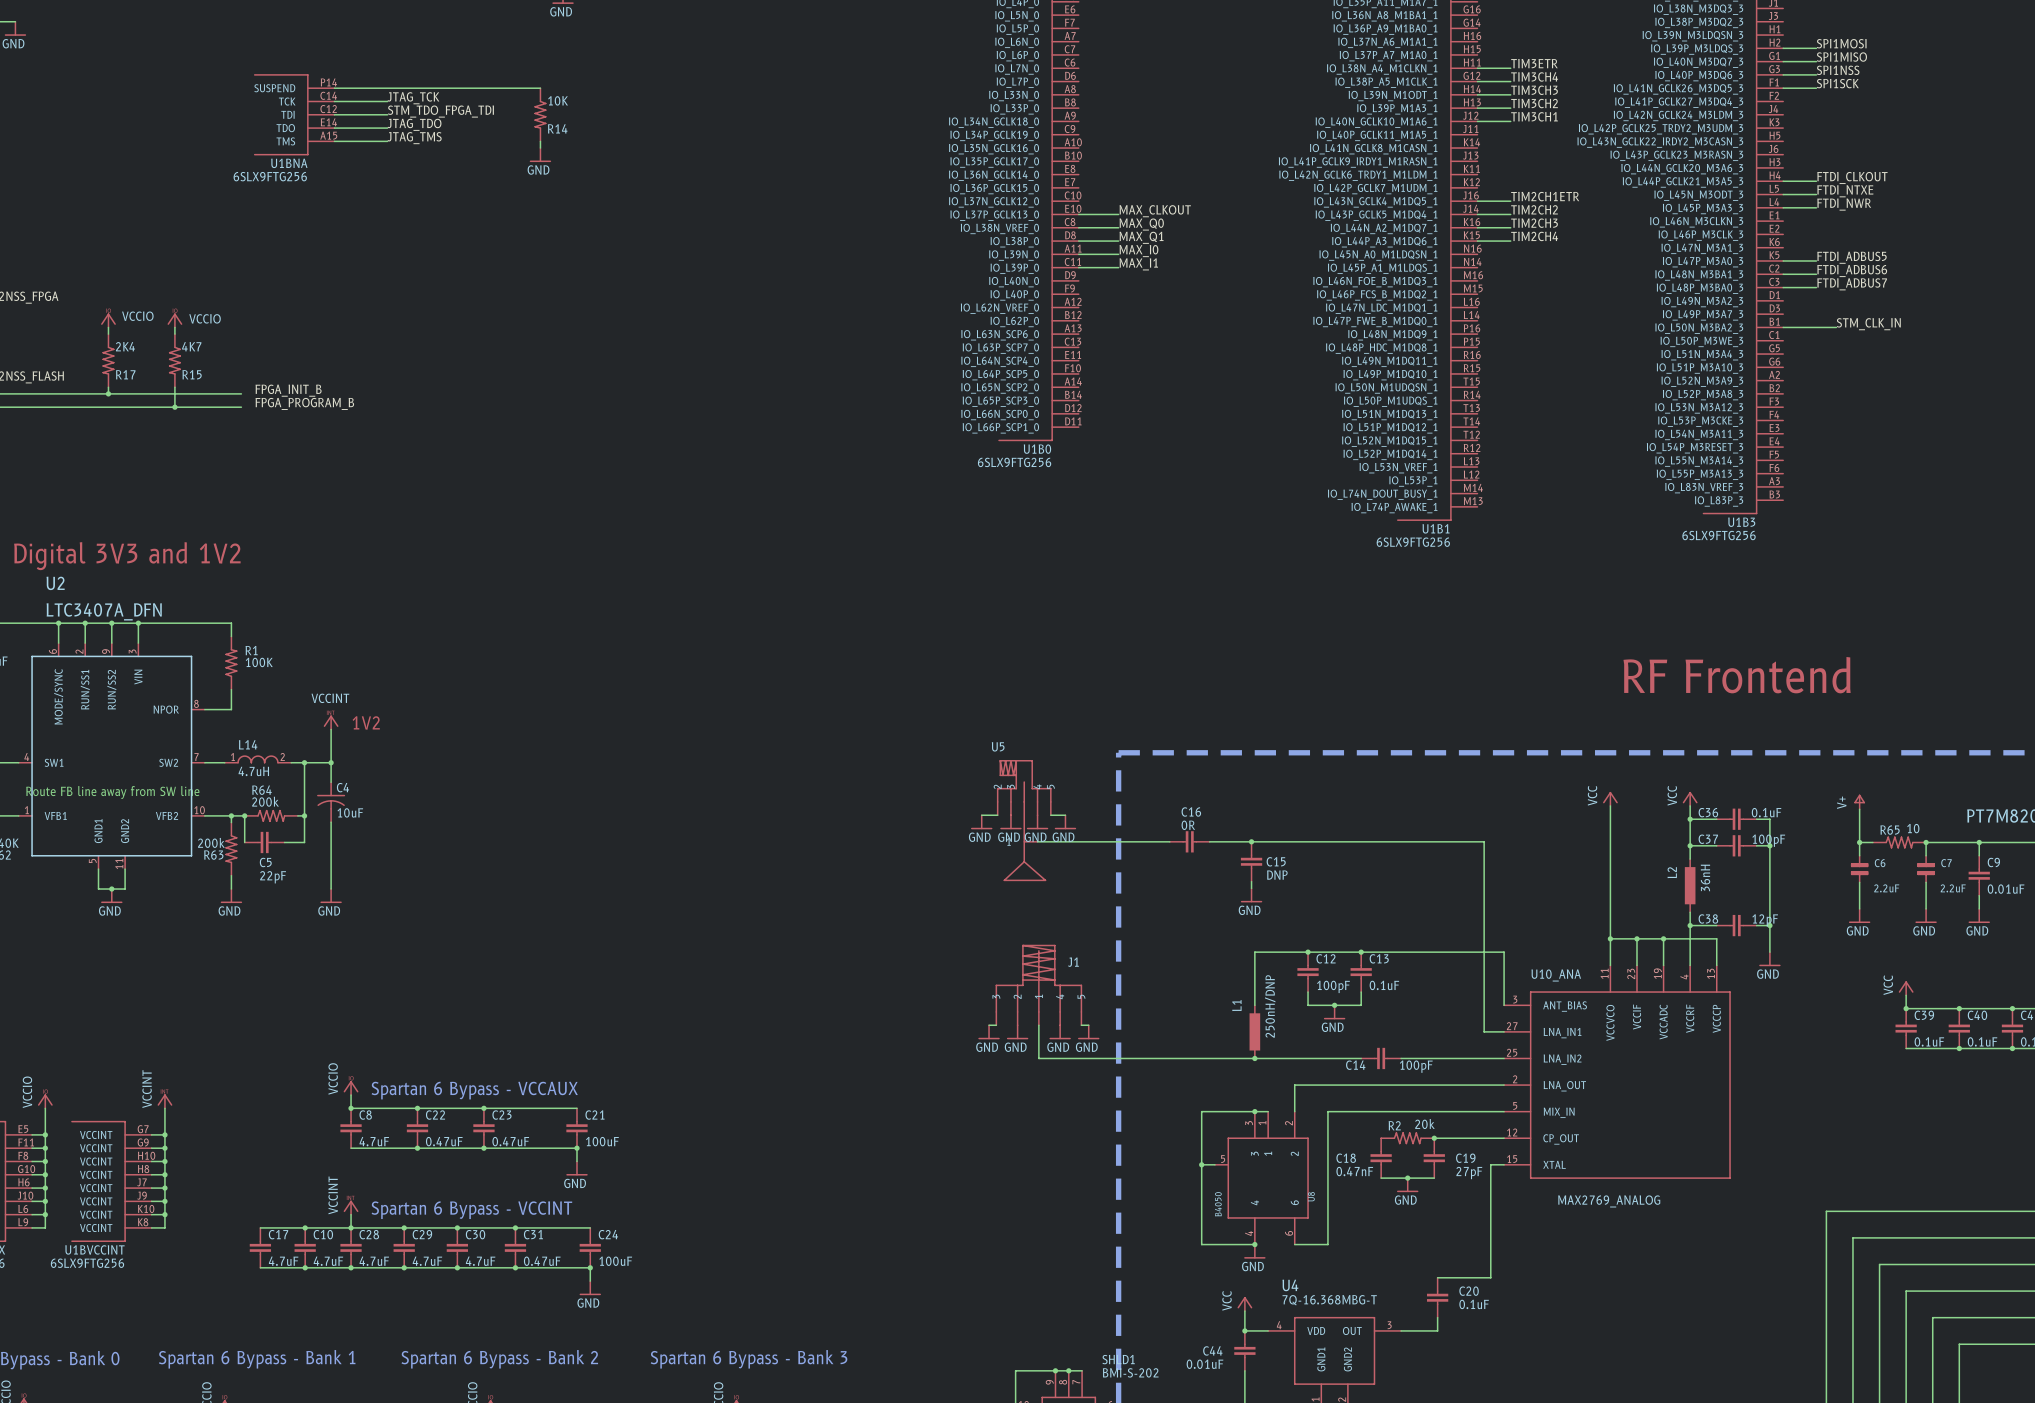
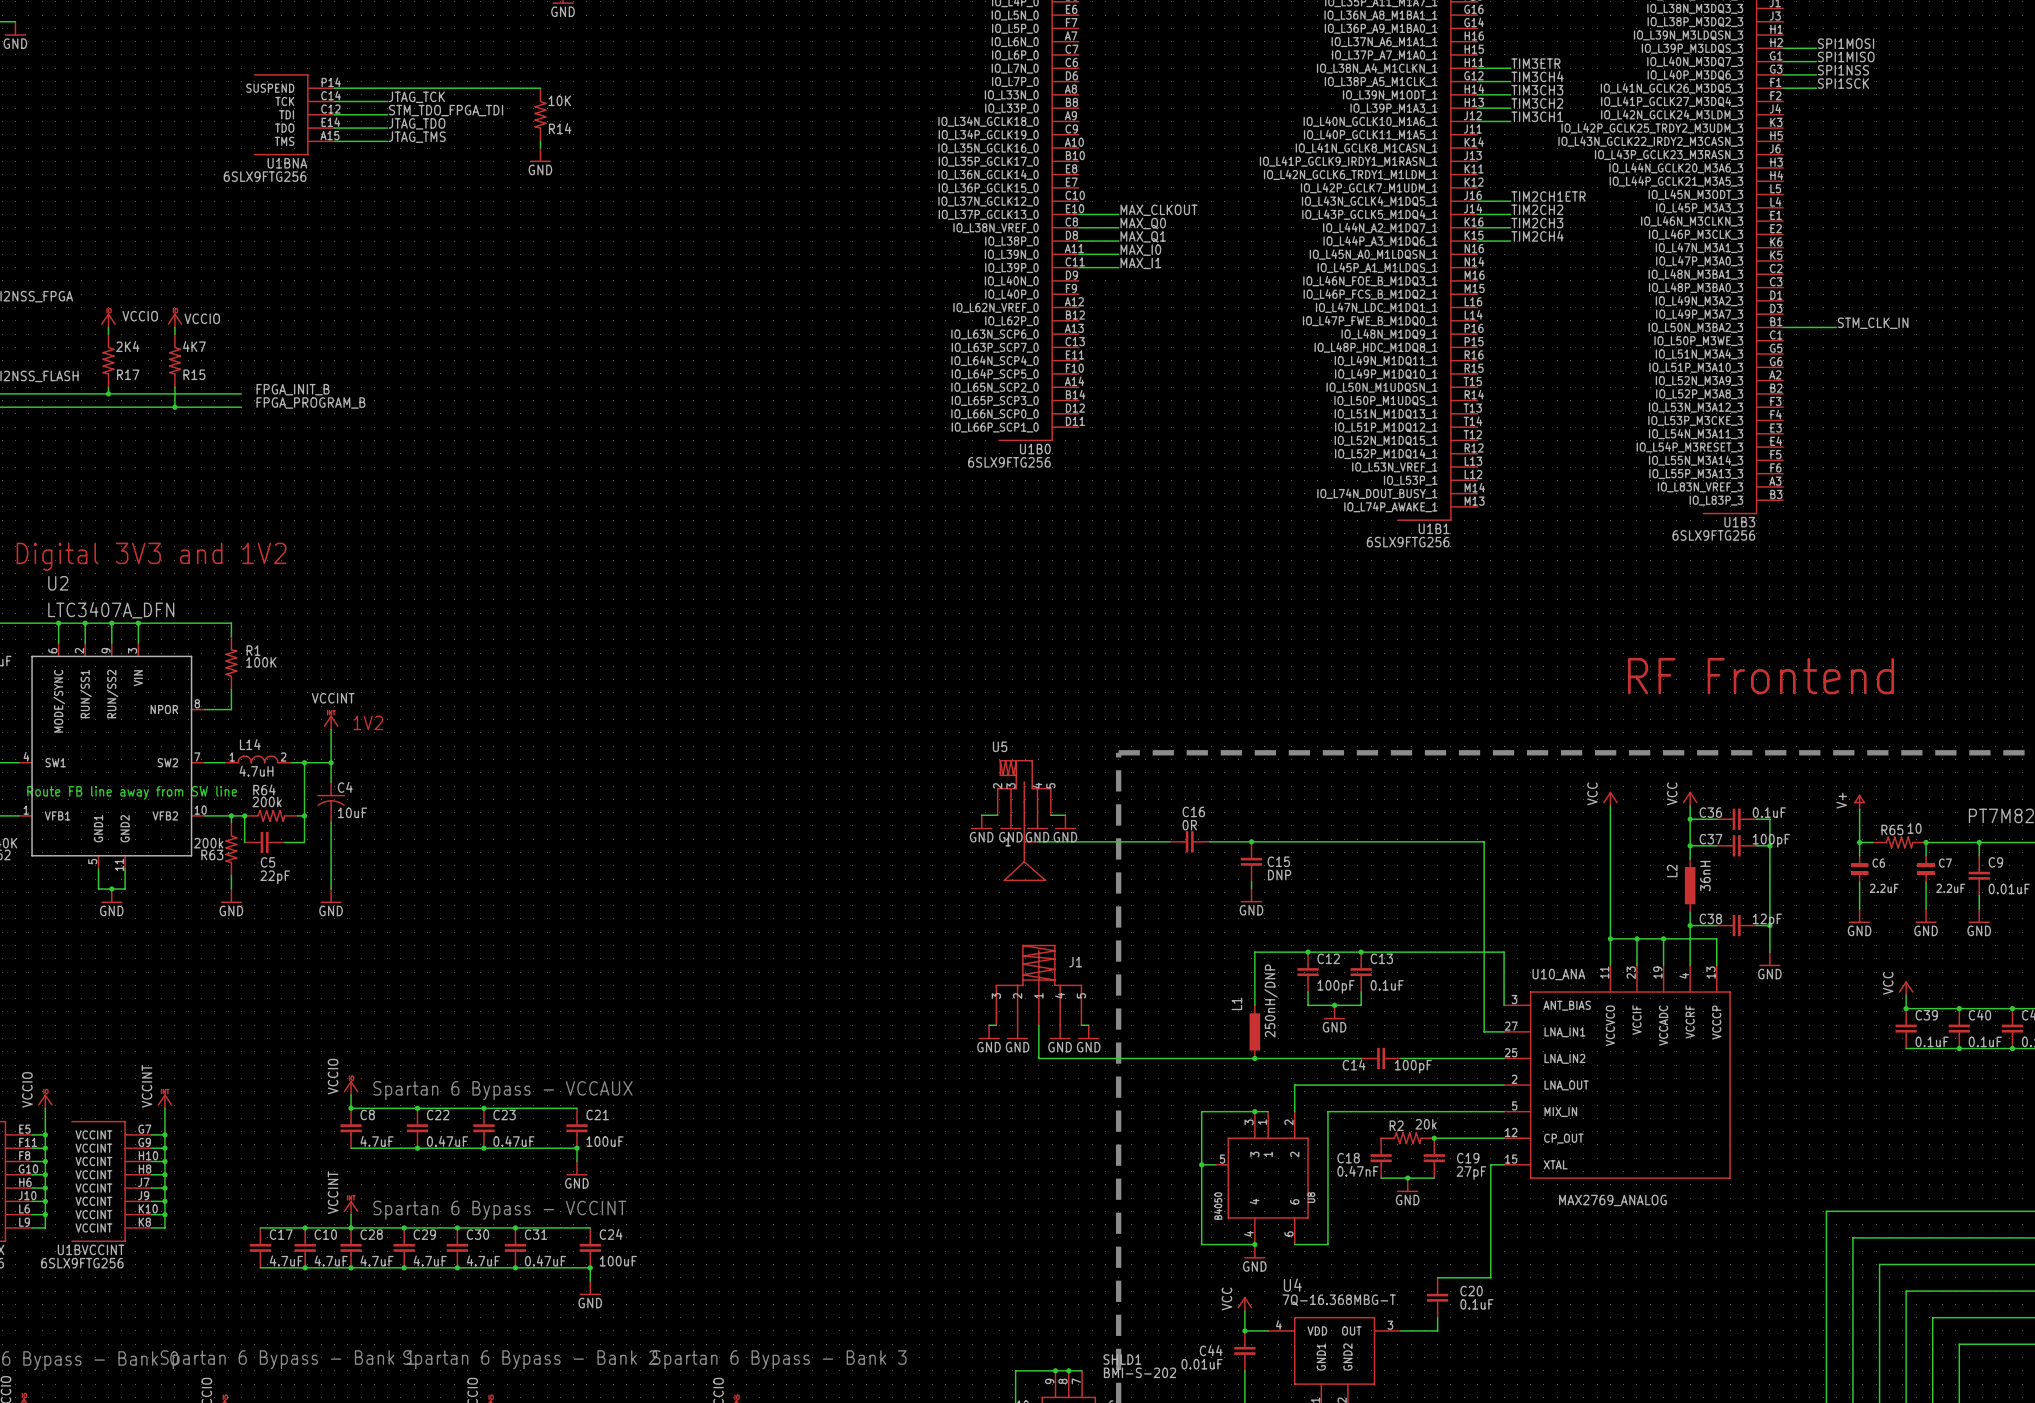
label: FTDI_CLKOUT (1852, 177) -> none
wire: (1783, 181) (1816, 181) -> none
label: FTDI_NTXE (1845, 191) -> none
wire: (1783, 194) (1816, 194) -> none
label: FTDI_NWR (1844, 204) -> none
wire: (1783, 207) (1816, 207) -> none
label: FTDI_ADBUS5 (1851, 257) -> none
wire: (1783, 260) (1816, 260) -> none
label: FTDI_ADBUS6 (1852, 271) -> none
wire: (1783, 274) (1816, 274) -> none
label: FTDI_ADBUS7 (1852, 284) -> none
wire: (1783, 287) (1816, 287) -> none

